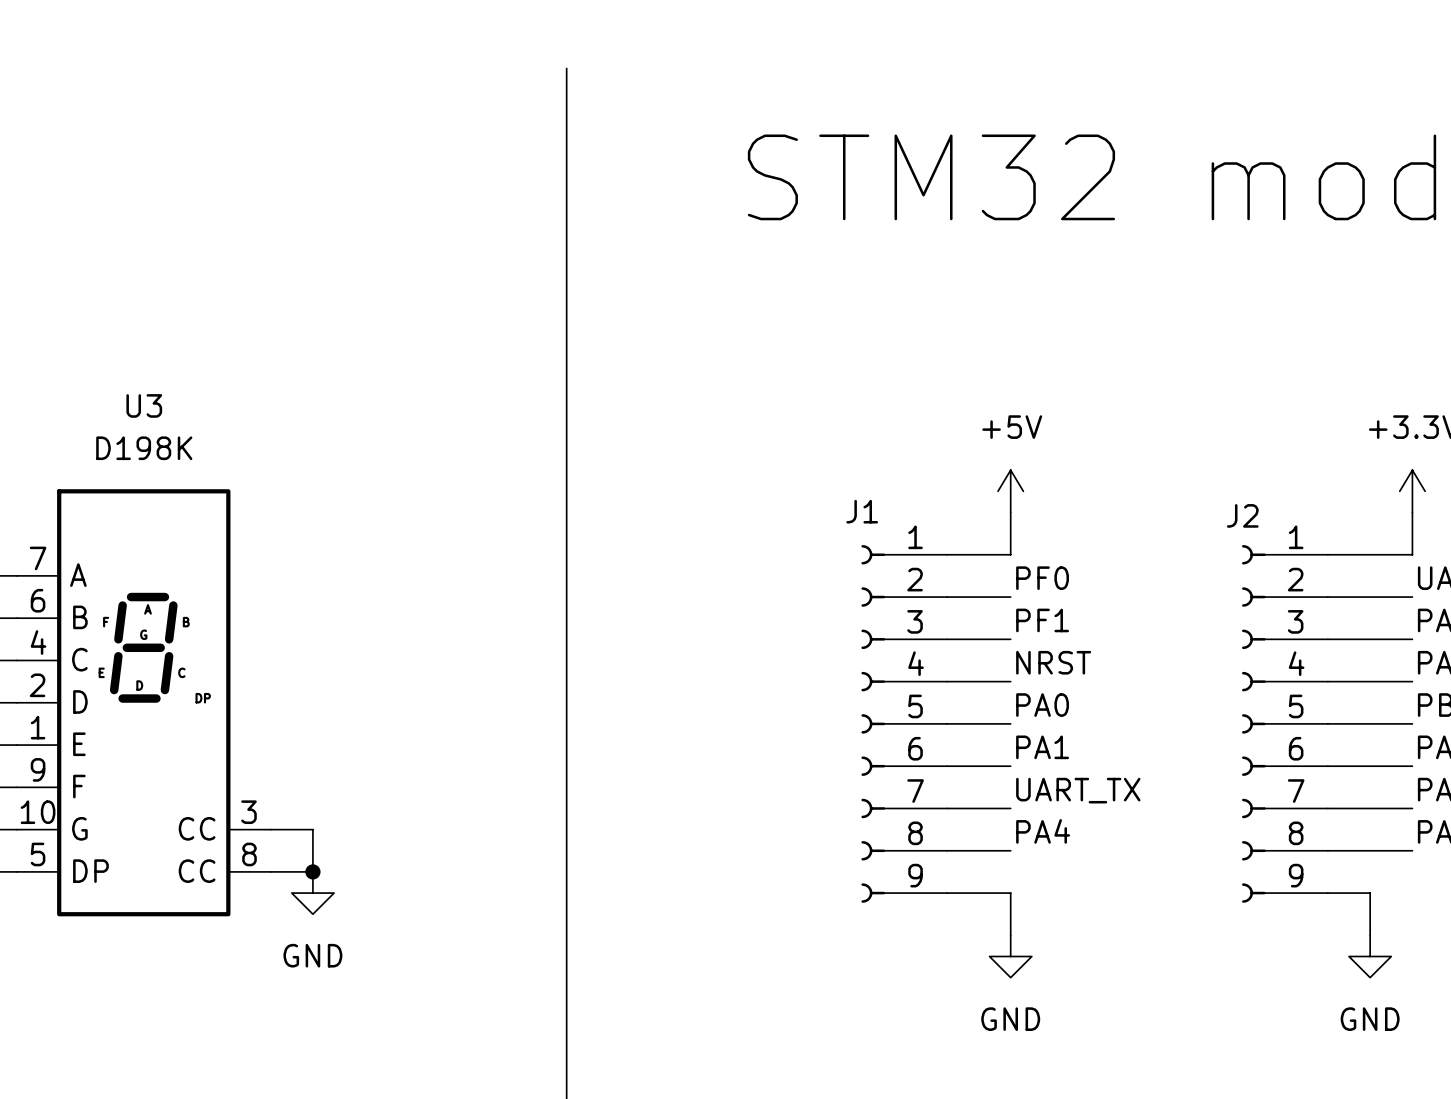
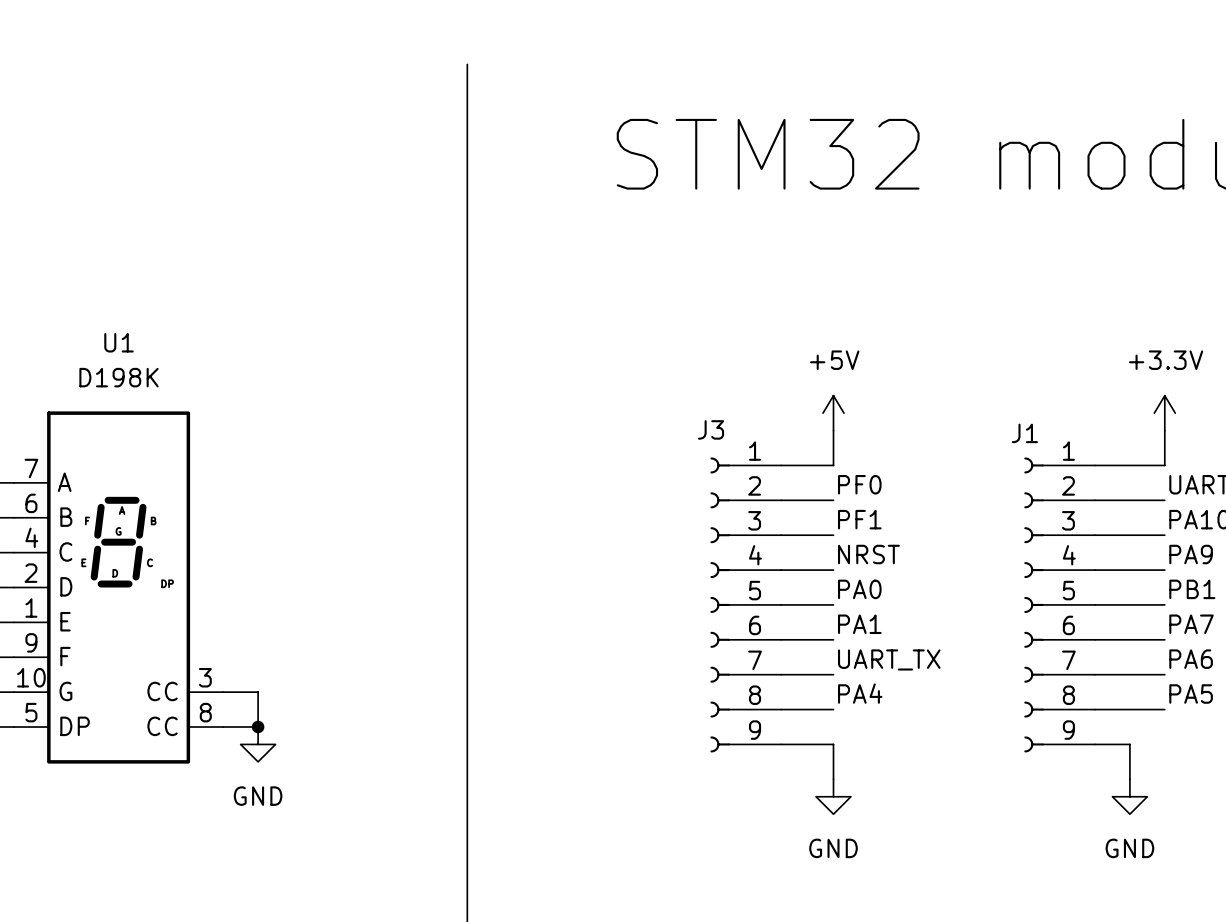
U3 name: U3 (144, 405) -> U1 (119, 342)
J1 name: J1 (862, 511) -> J3 (711, 429)
J2 name: J2 (1242, 515) -> J1 (1024, 433)

